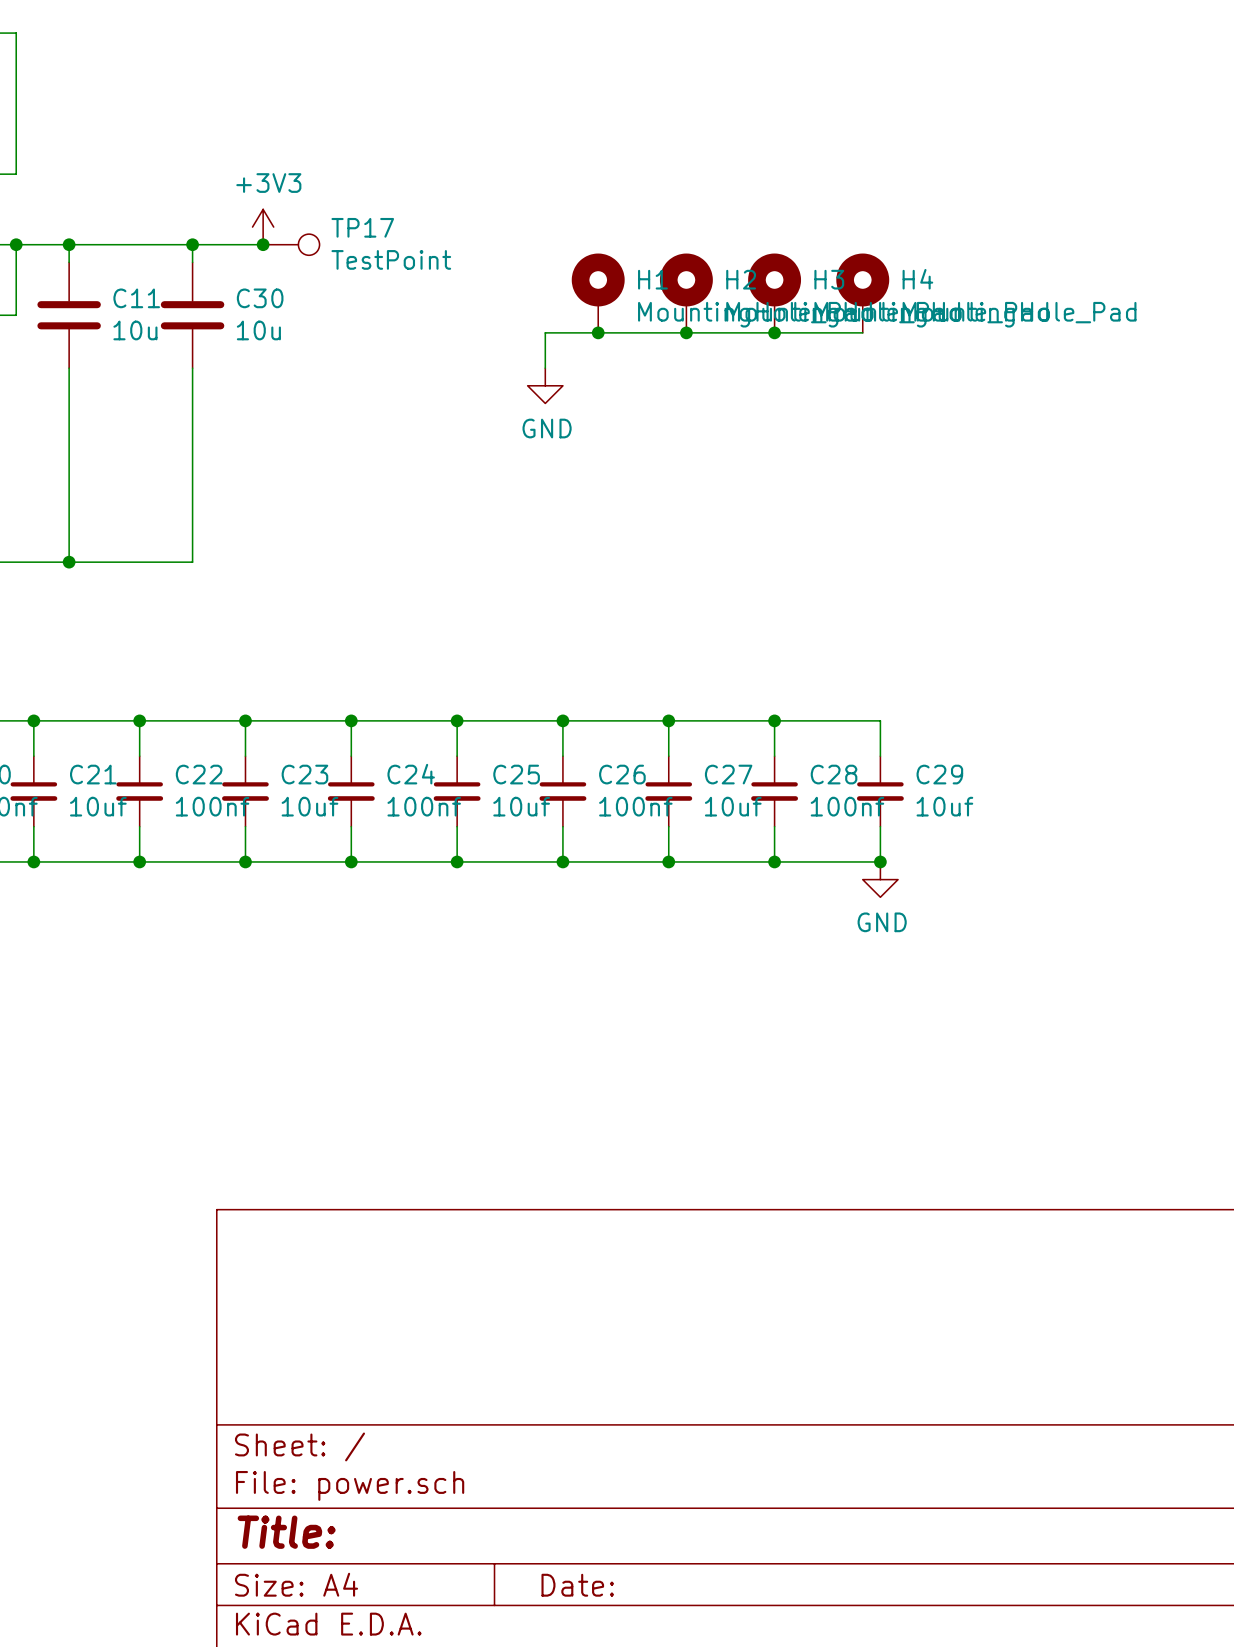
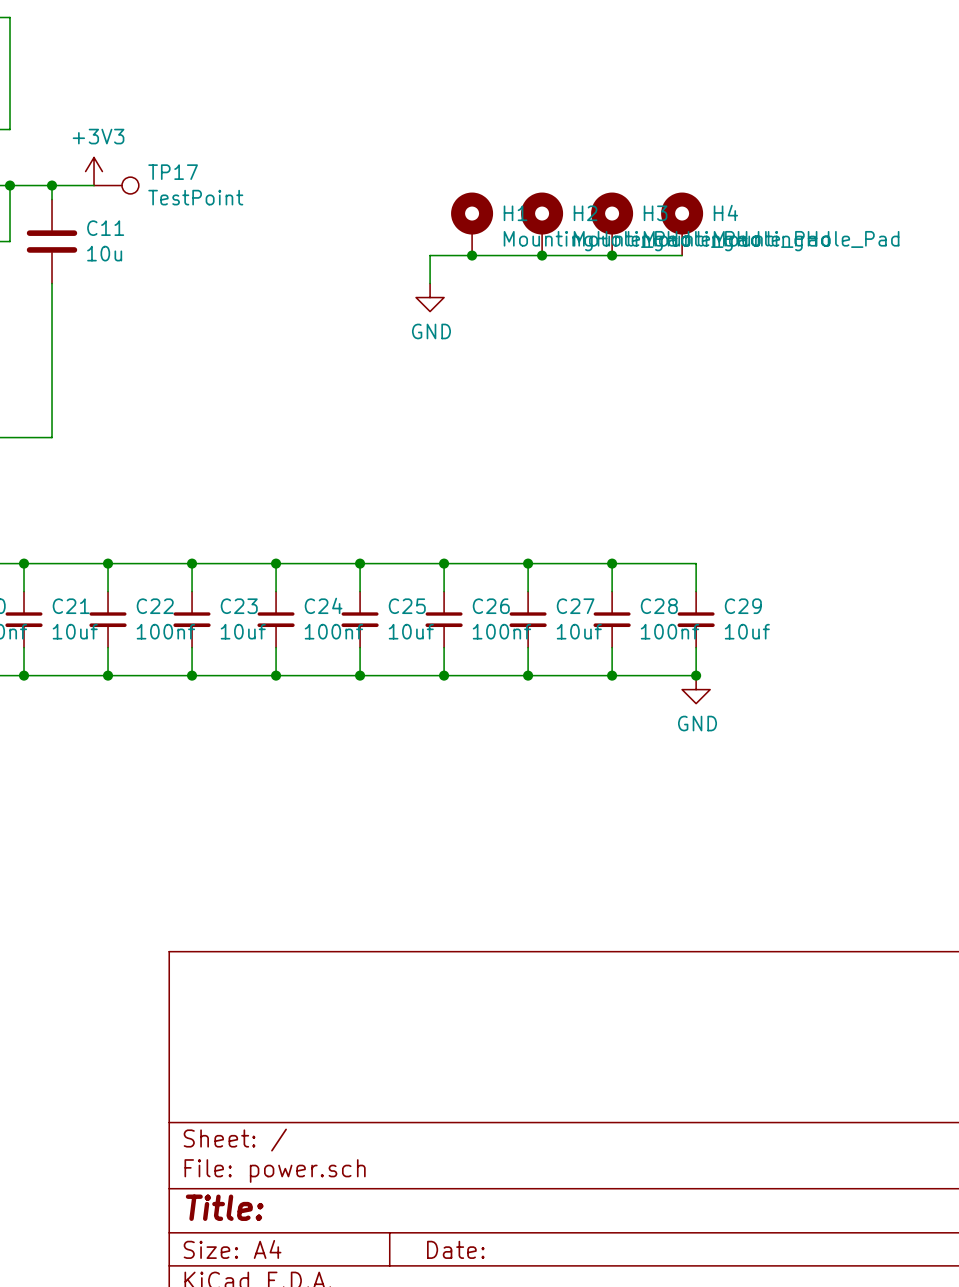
power symbol position: +3V3 (263, 227) -> +3V3 (94, 171)
wire: (122, 244) (263, 244) -> none
wire: (192, 244) (192, 262) -> none
junction: (192, 244) -> none
junction: (263, 244) -> none
TP17 position: (291, 244) -> (116, 185)
C30: 10u (192, 315) -> none
wire: (192, 368) (192, 562) (69, 562) -> none
junction: (69, 562) -> none

